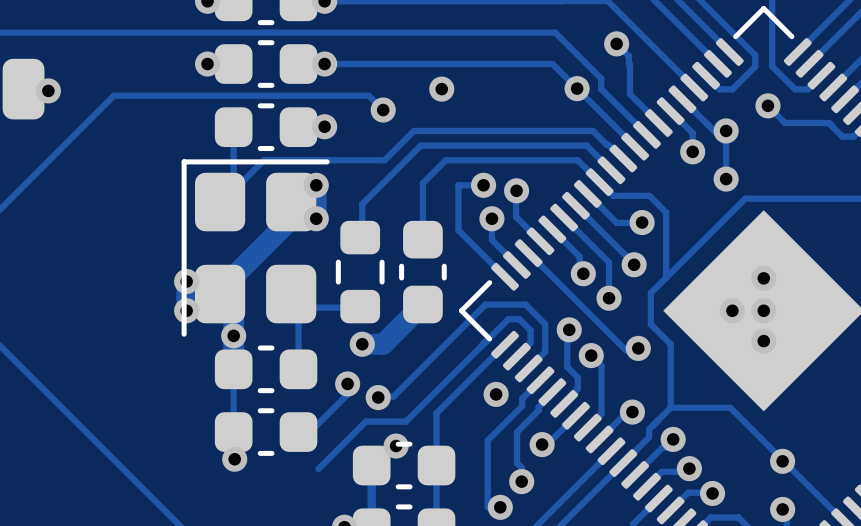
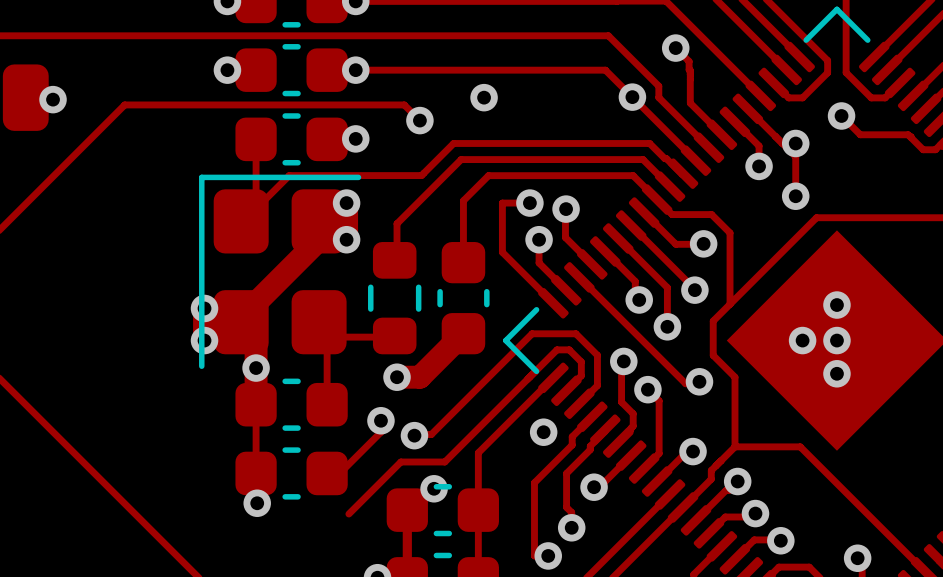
via: (782, 461) -> none

